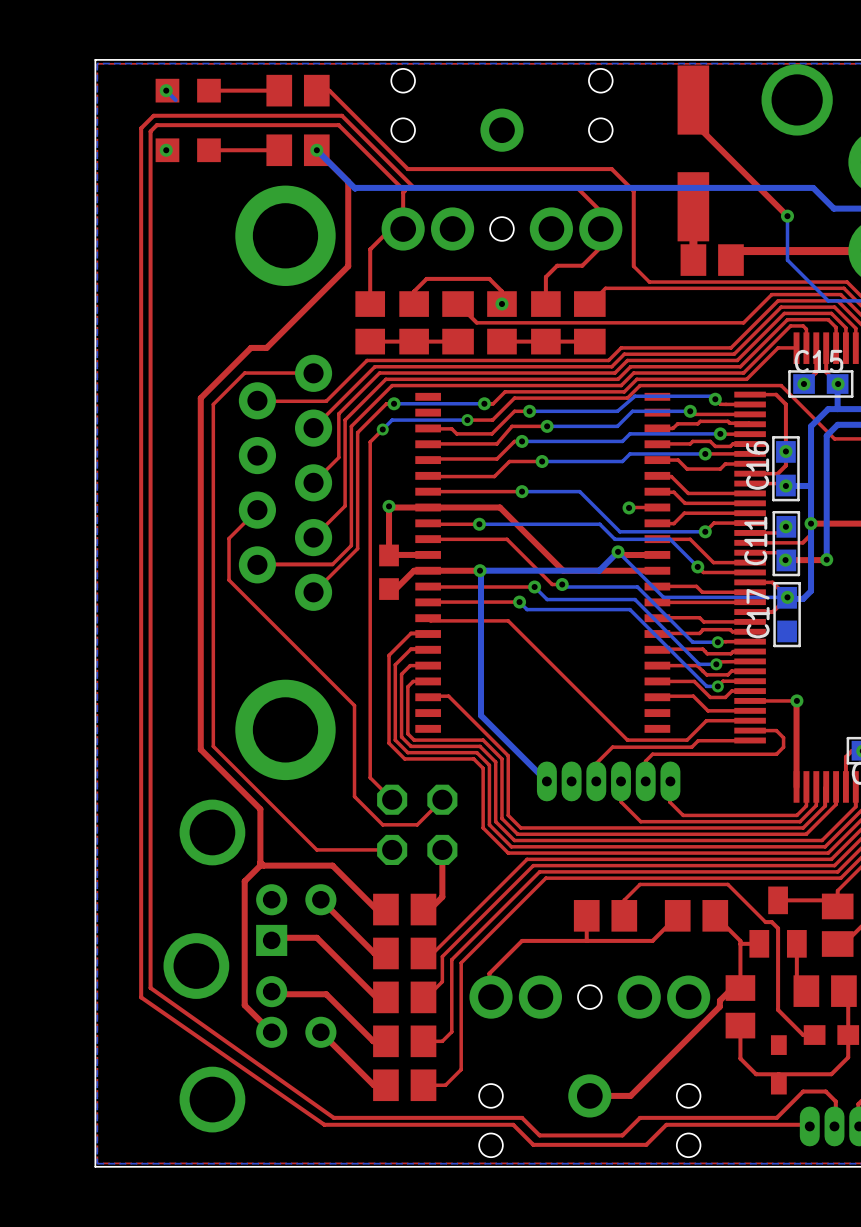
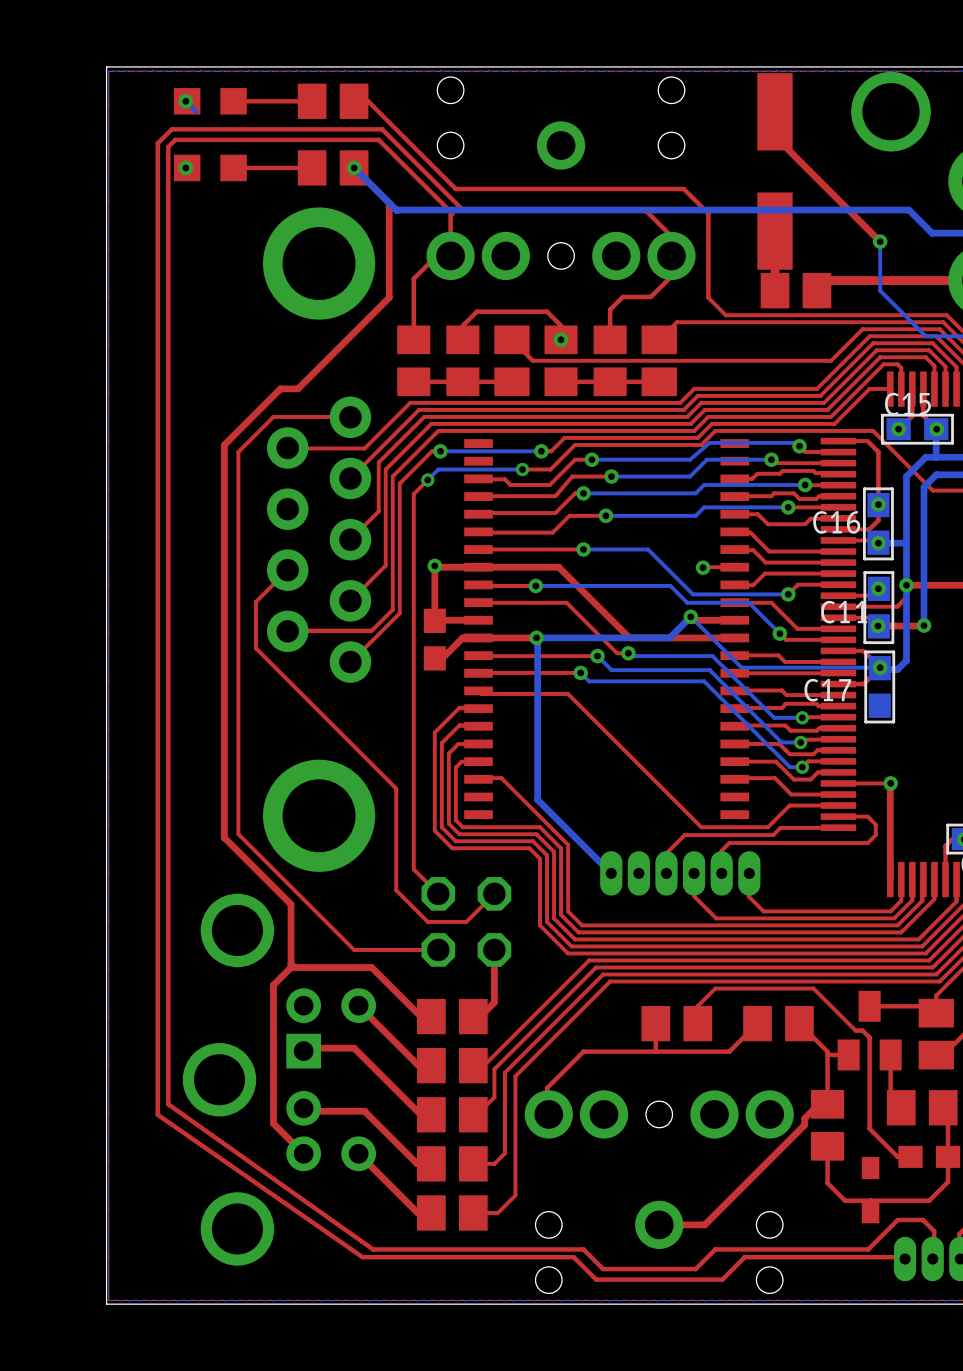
C16 name rotation: 0° (757, 465) -> 90° clockwise (836, 522)
C11 name rotation: 0° (755, 540) -> 90° clockwise (844, 612)
C17 name rotation: 0° (758, 613) -> 90° clockwise (827, 690)

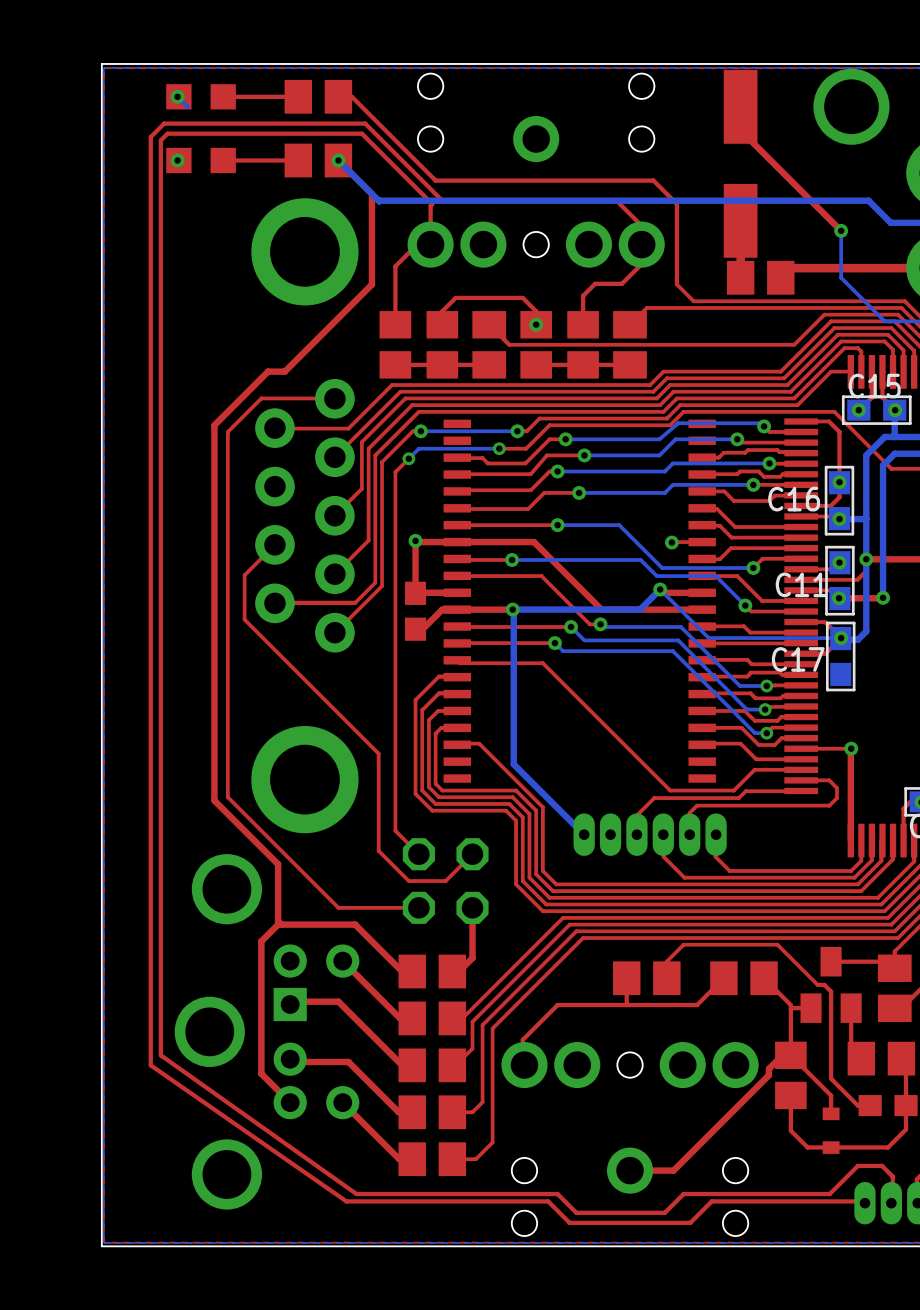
top track: none -> (790, 1055) (831, 1095) (831, 1113)
part footprint: [861, 1157, 880, 1224] -> [822, 1107, 840, 1154]

